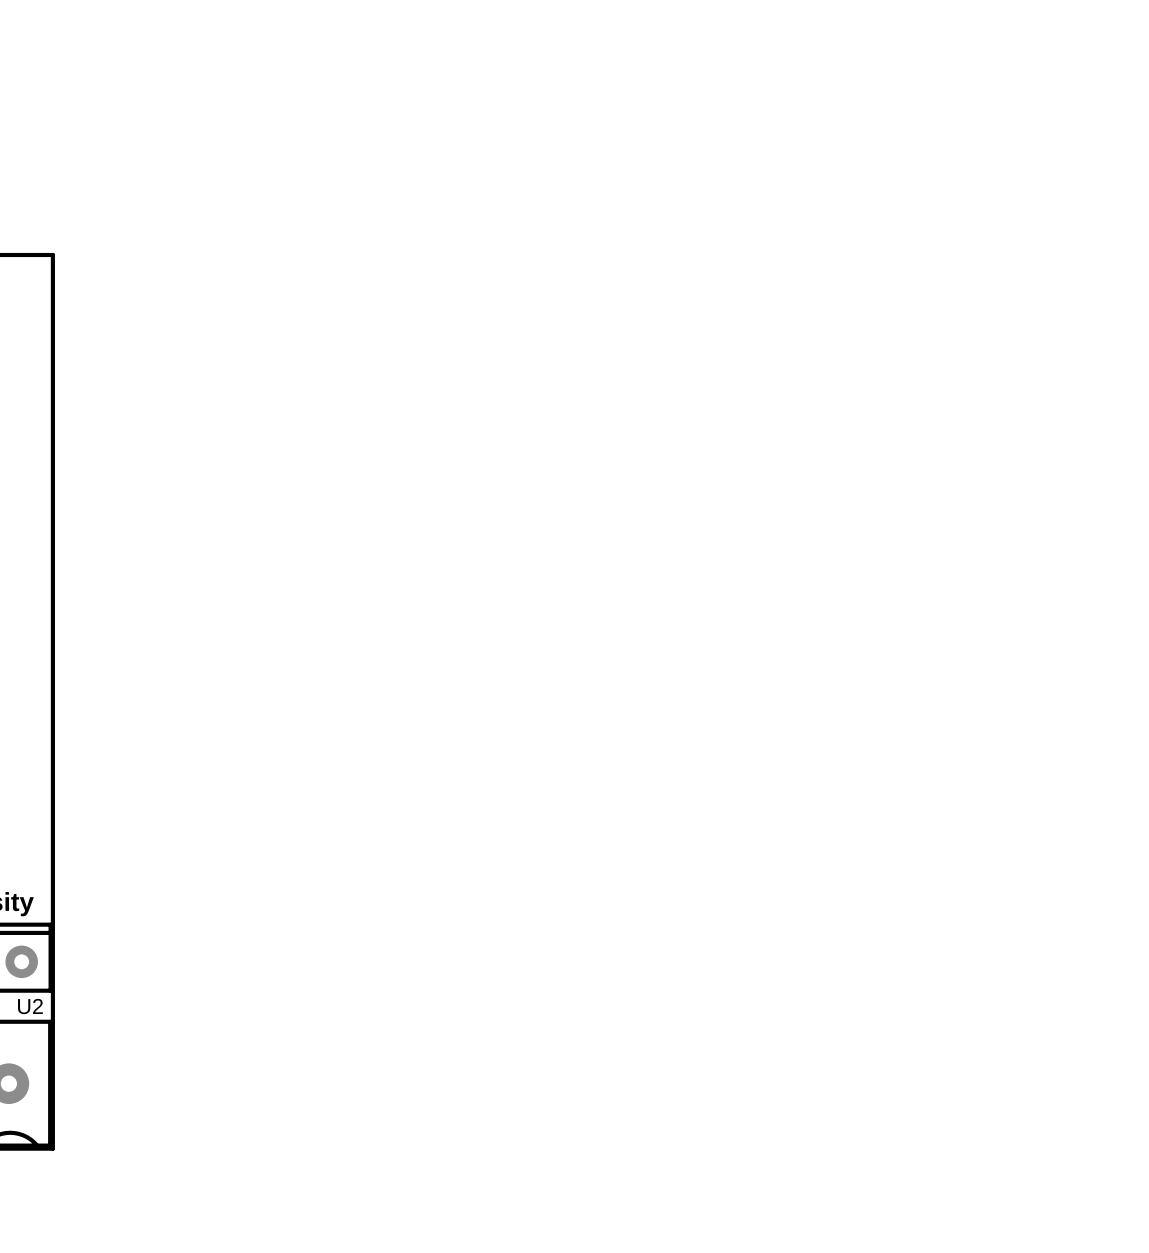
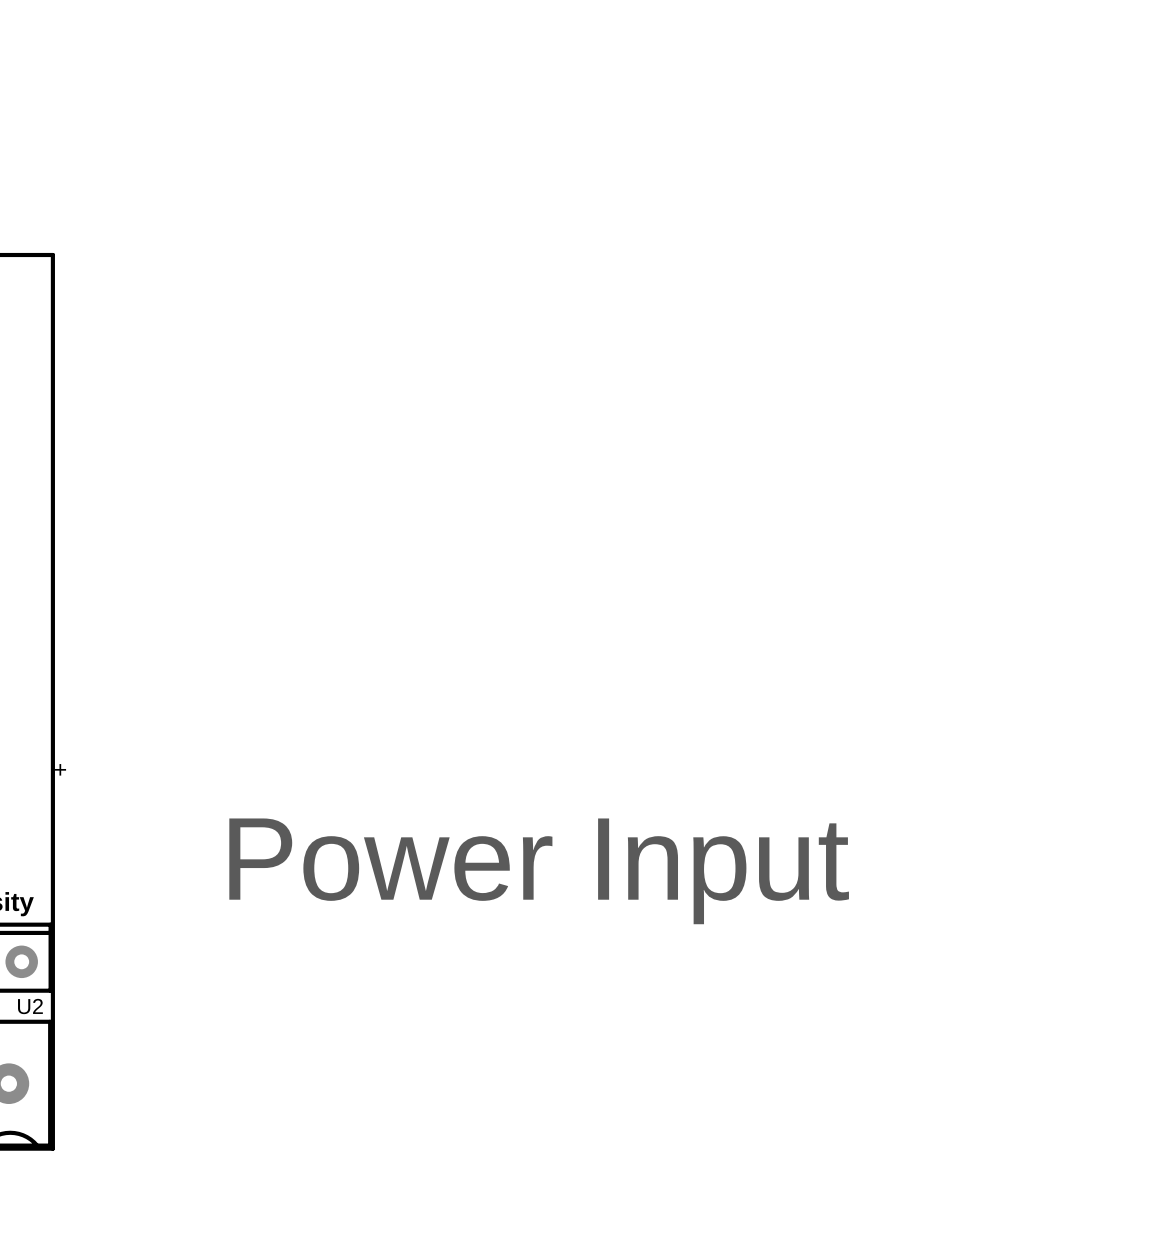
text: none -> + (60, 769)
text: none -> Power Input (539, 871)

